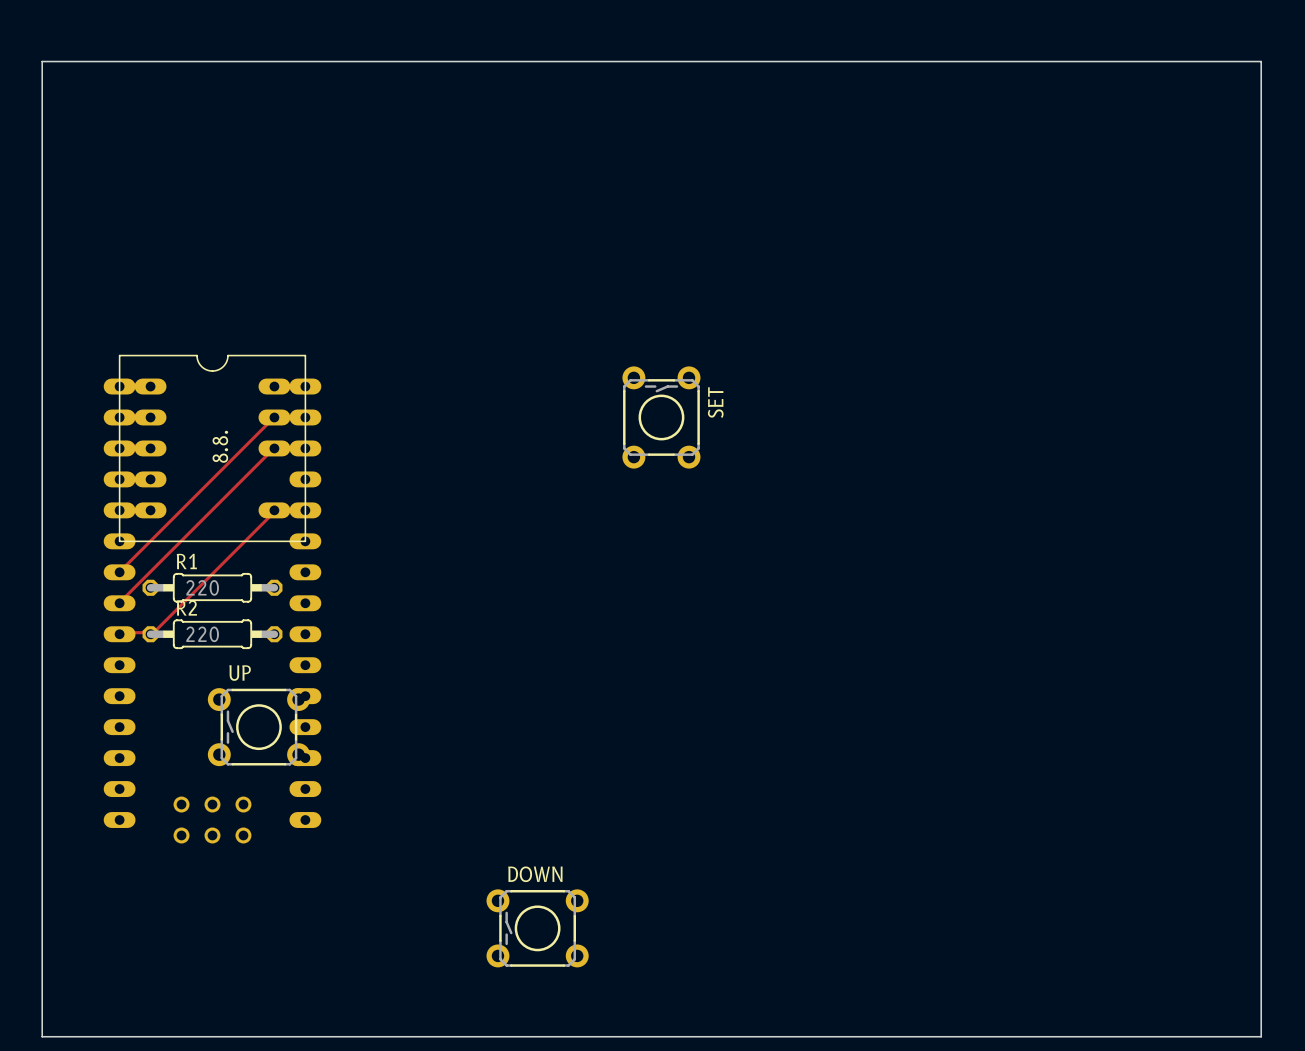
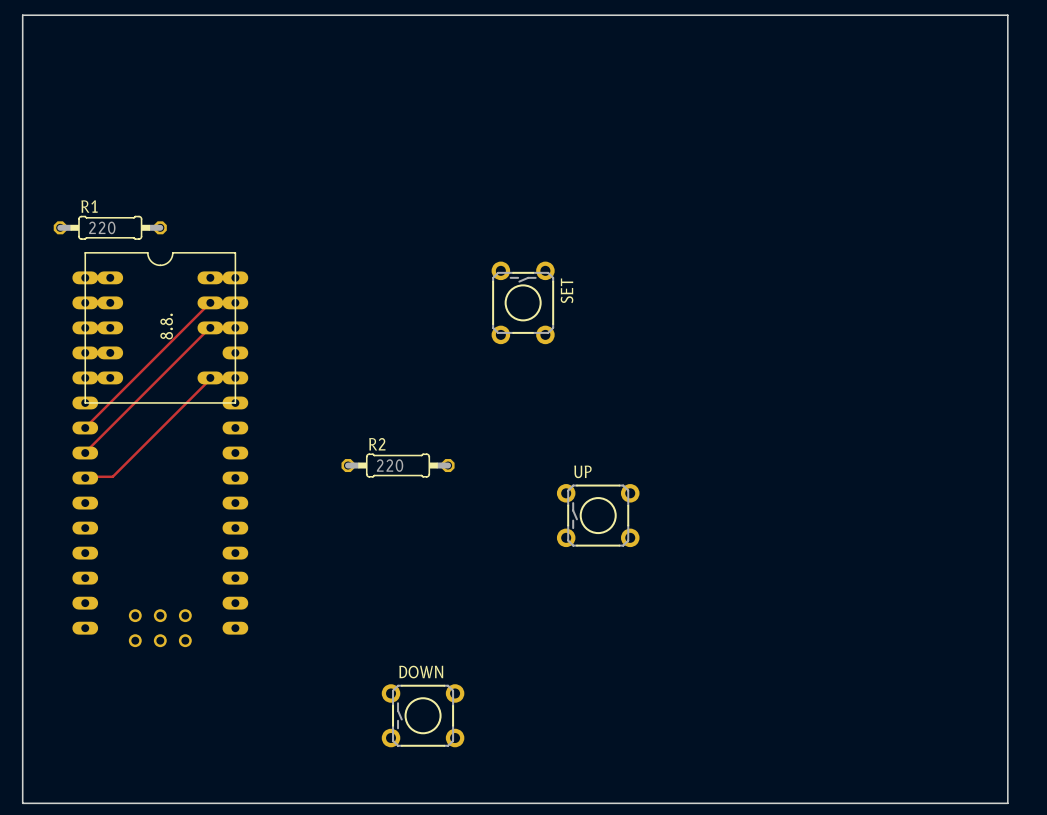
R1 position: (212, 587) -> (110, 227)
R2 position: (212, 634) -> (398, 465)
UP: none -> (598, 515)
UP: (258, 727) -> none

